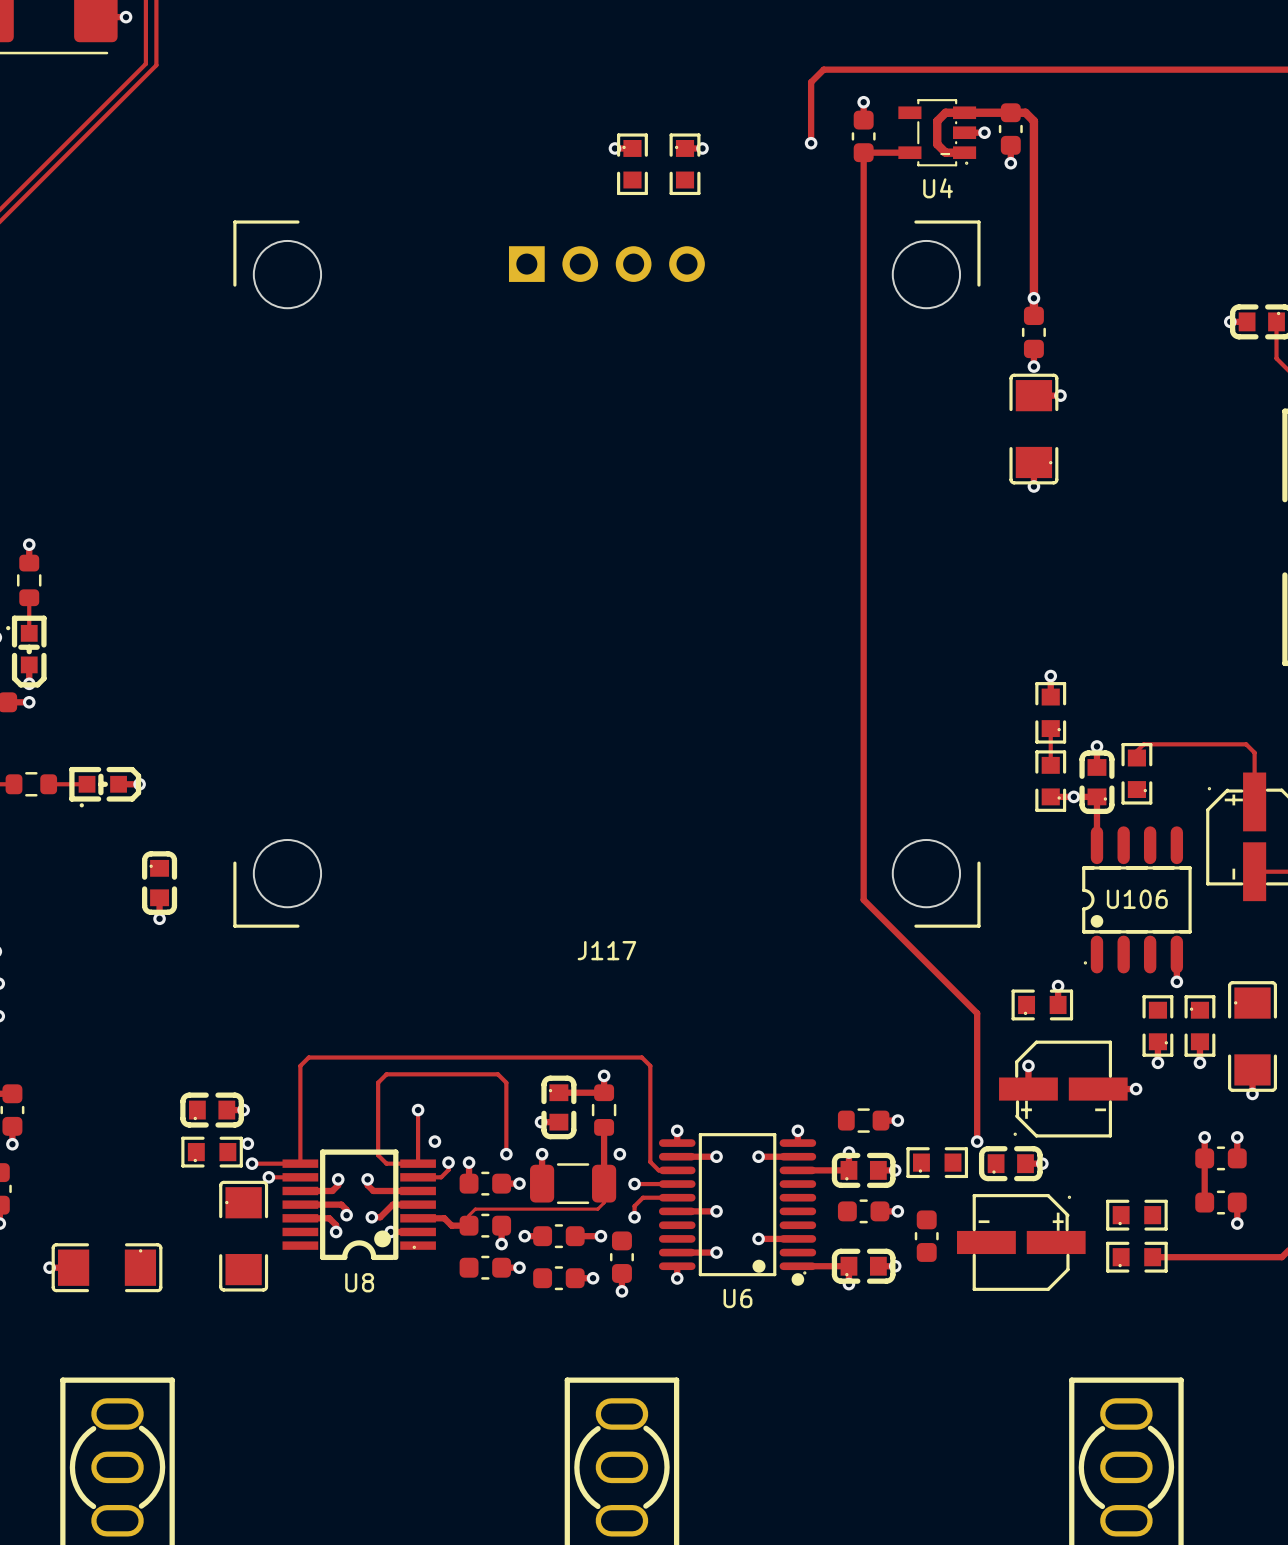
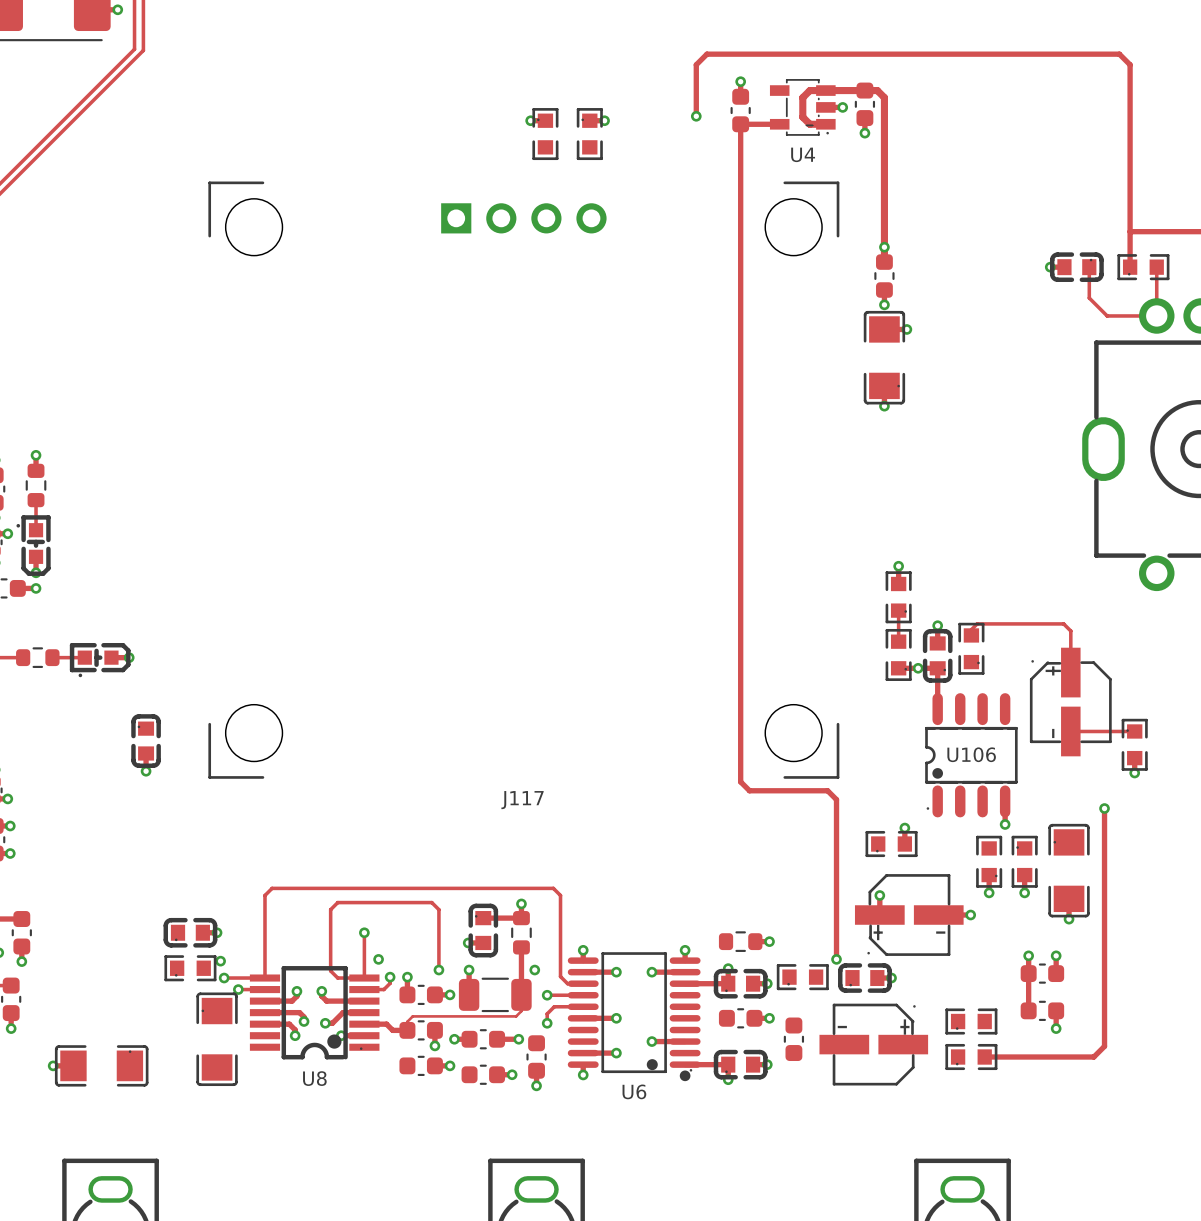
track: (863, 899) (977, 1013) -> (740, 755) (740, 781) (749, 790) (827, 790) (836, 799) (836, 851)

